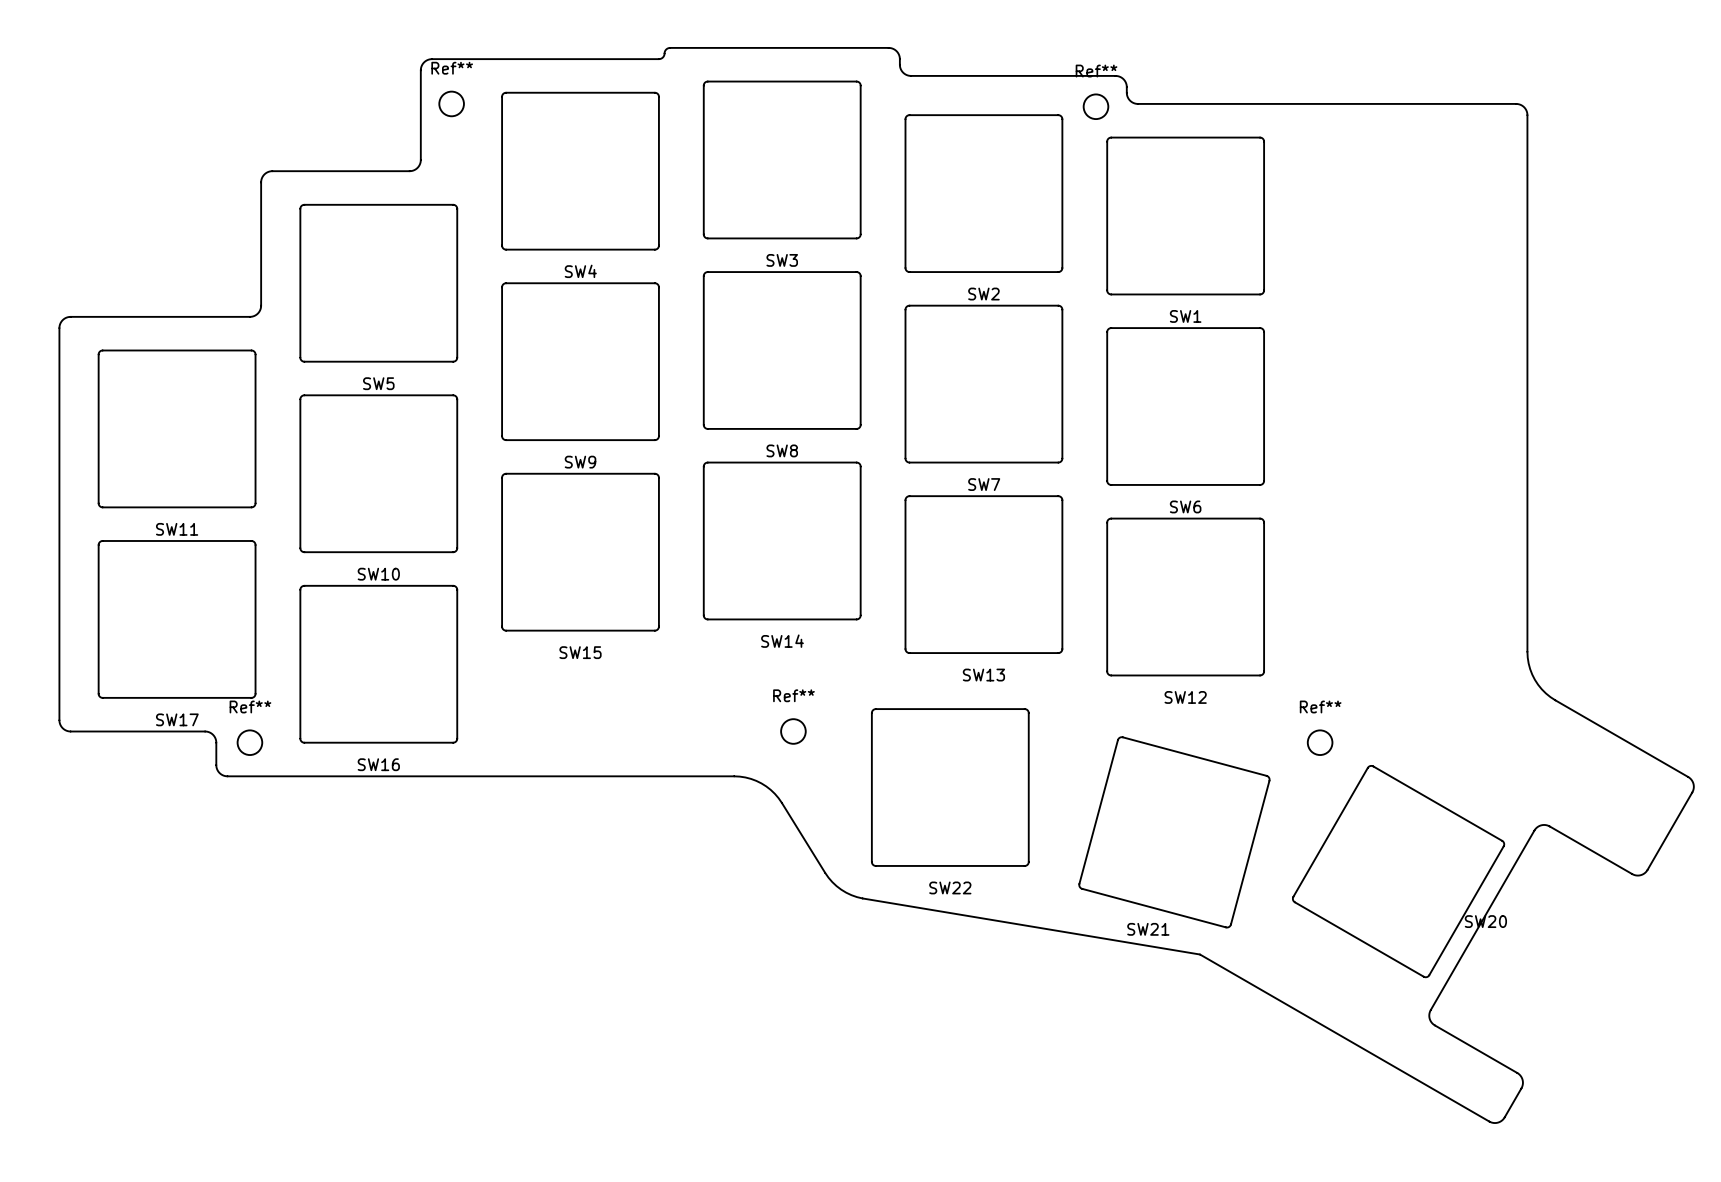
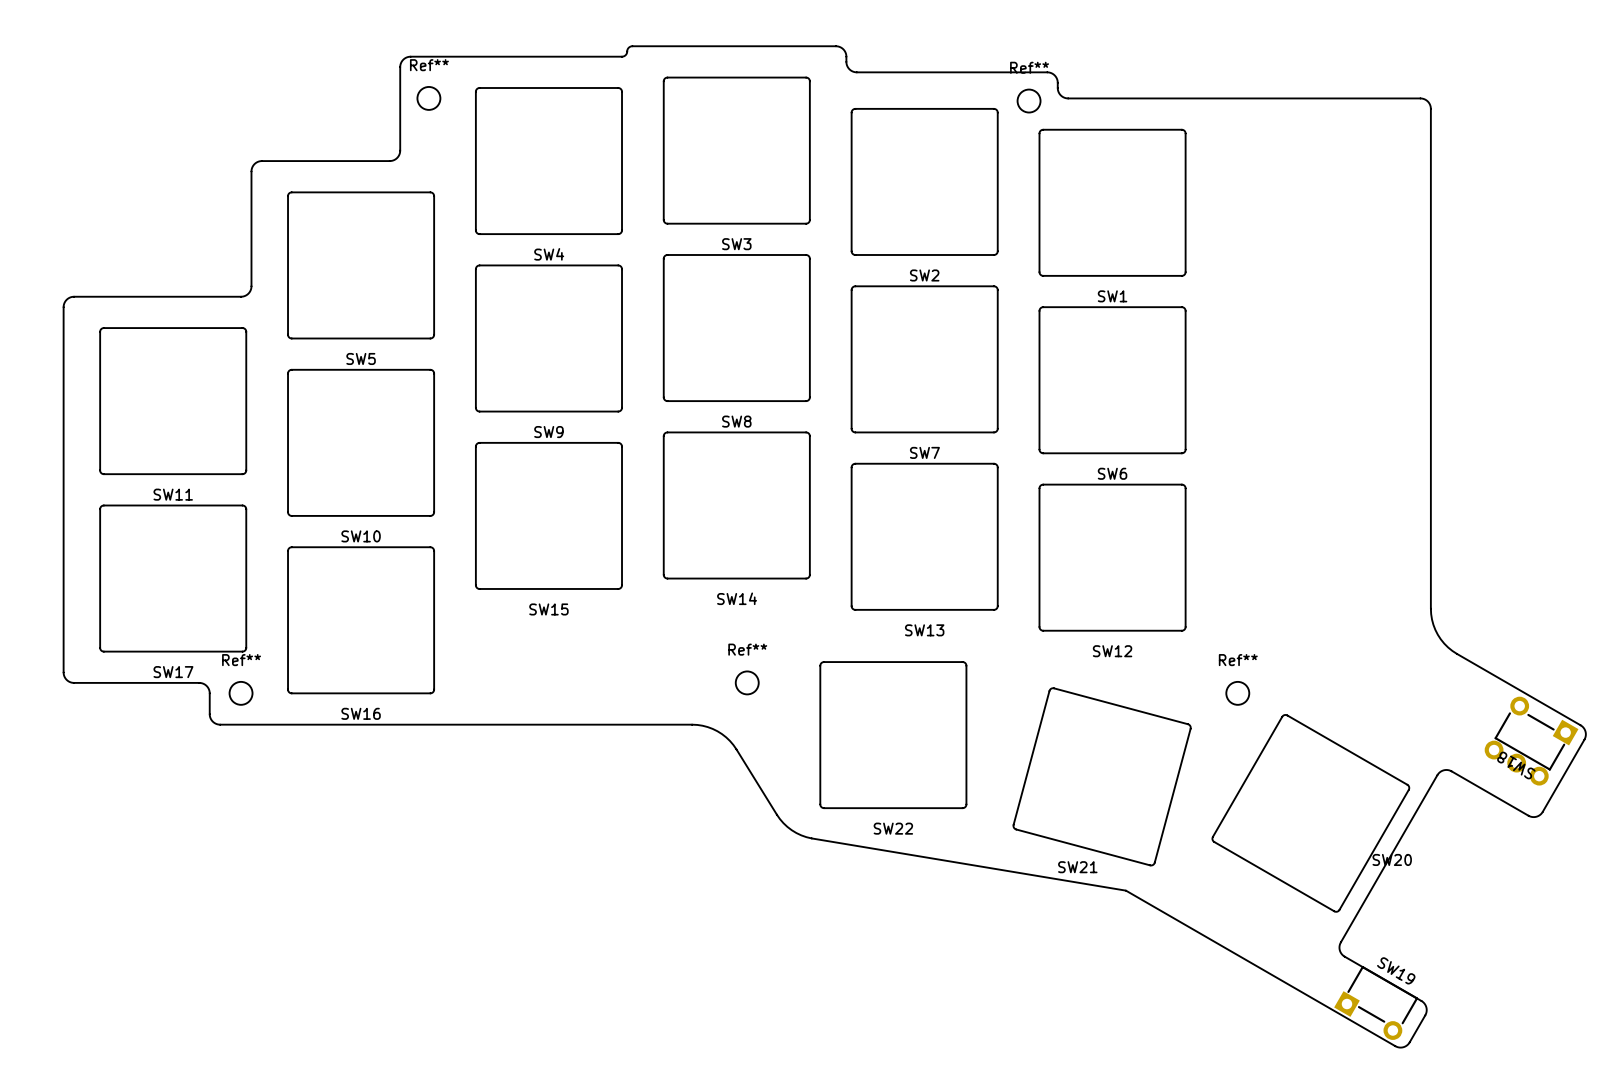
SW18: none -> (1536, 733)
part: none -> (1516, 763)
SW19: none -> (1376, 1002)

